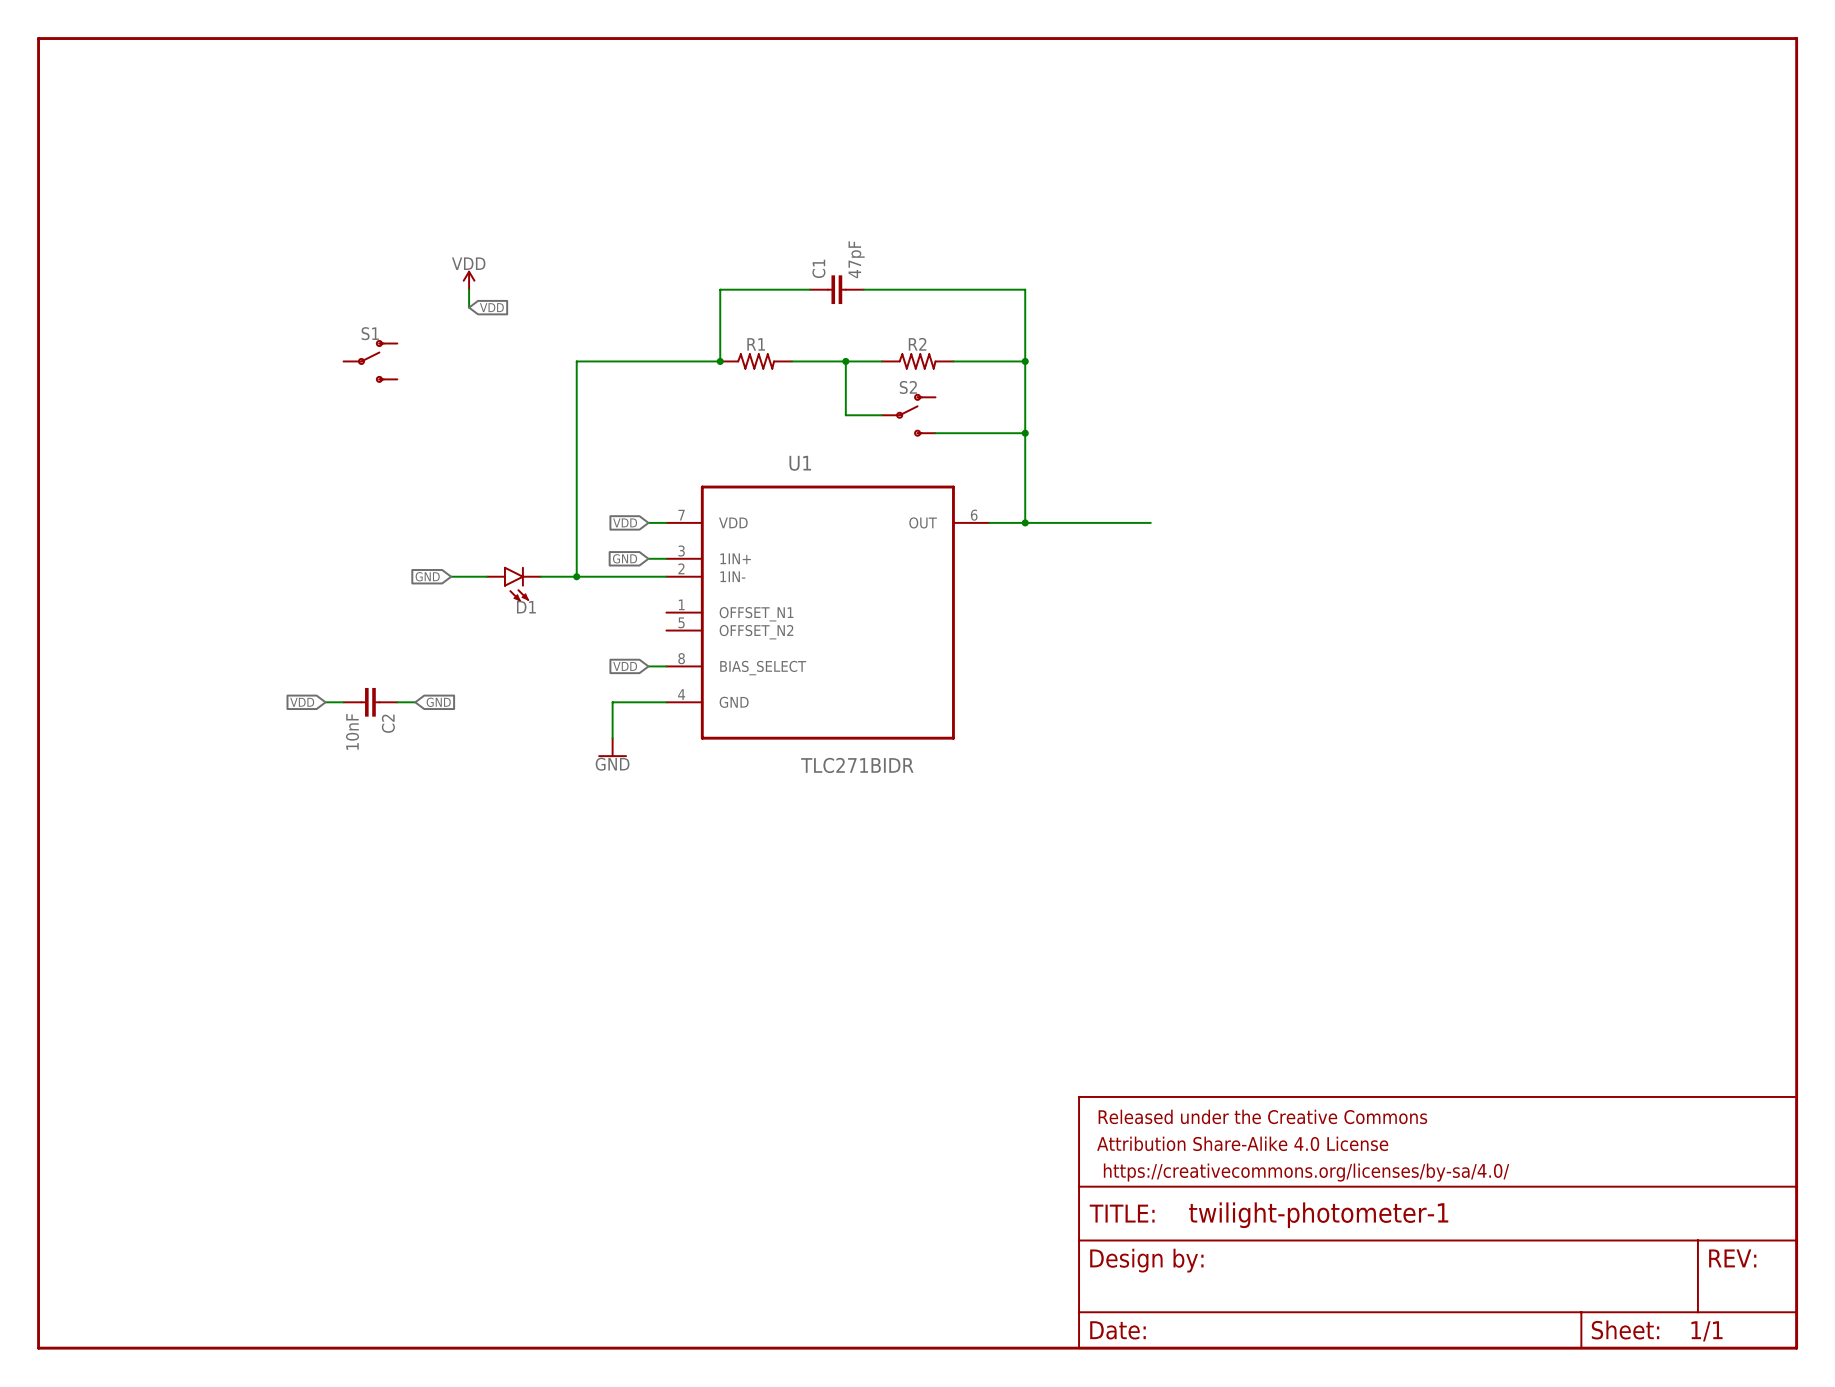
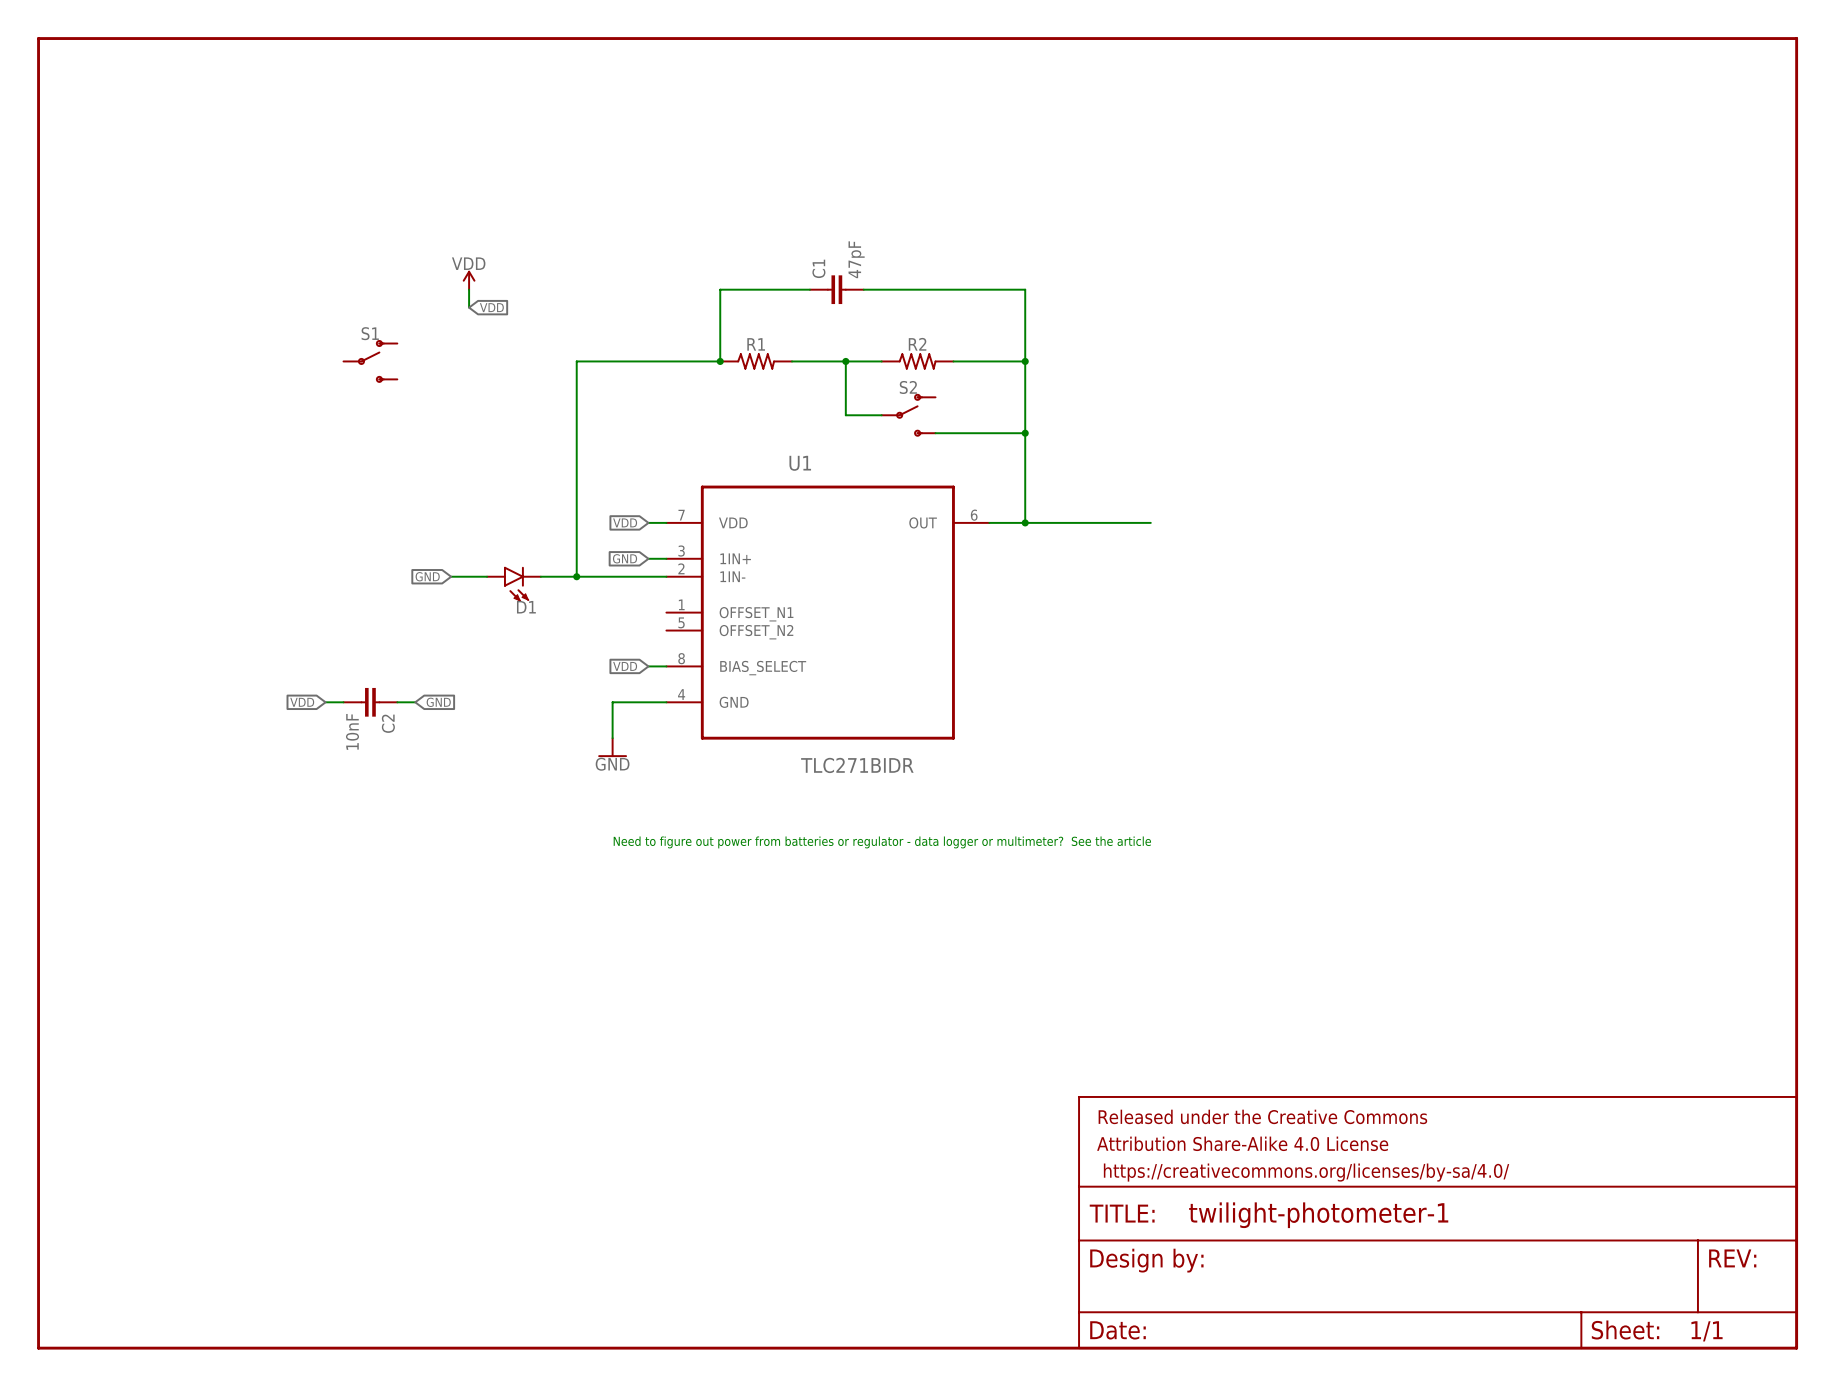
text: none -> Need to figure out power from batteries or regulator - data logger or multimeter? See the article (882, 842)

